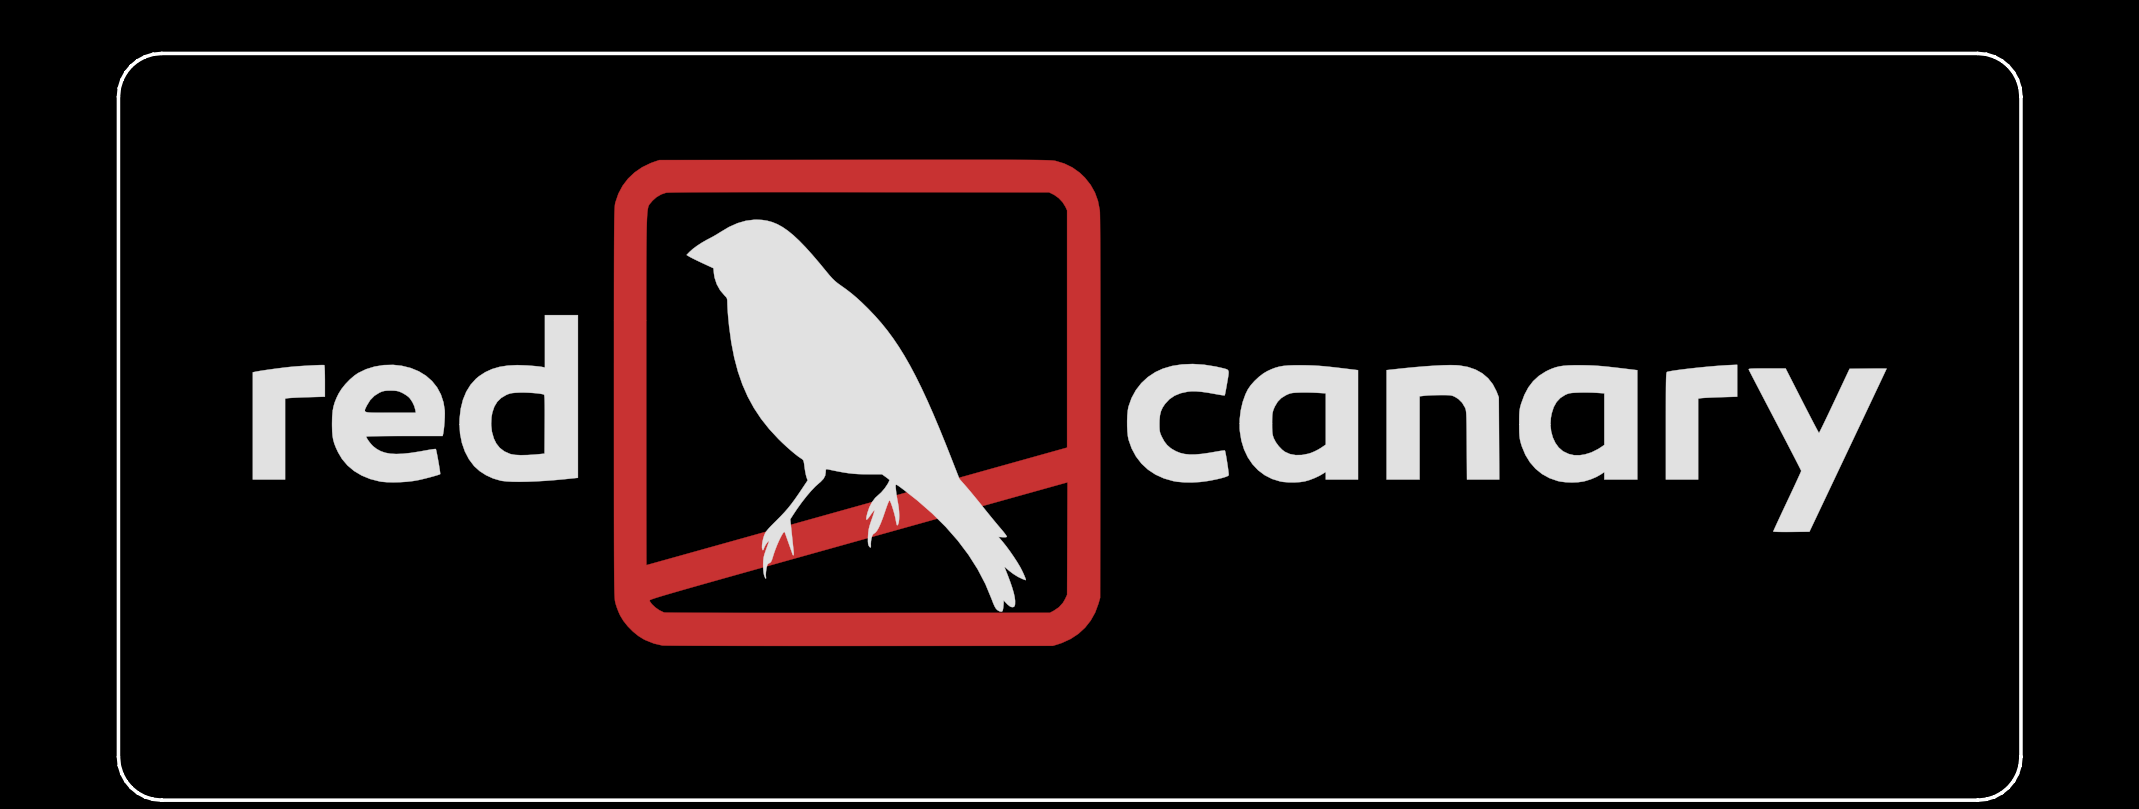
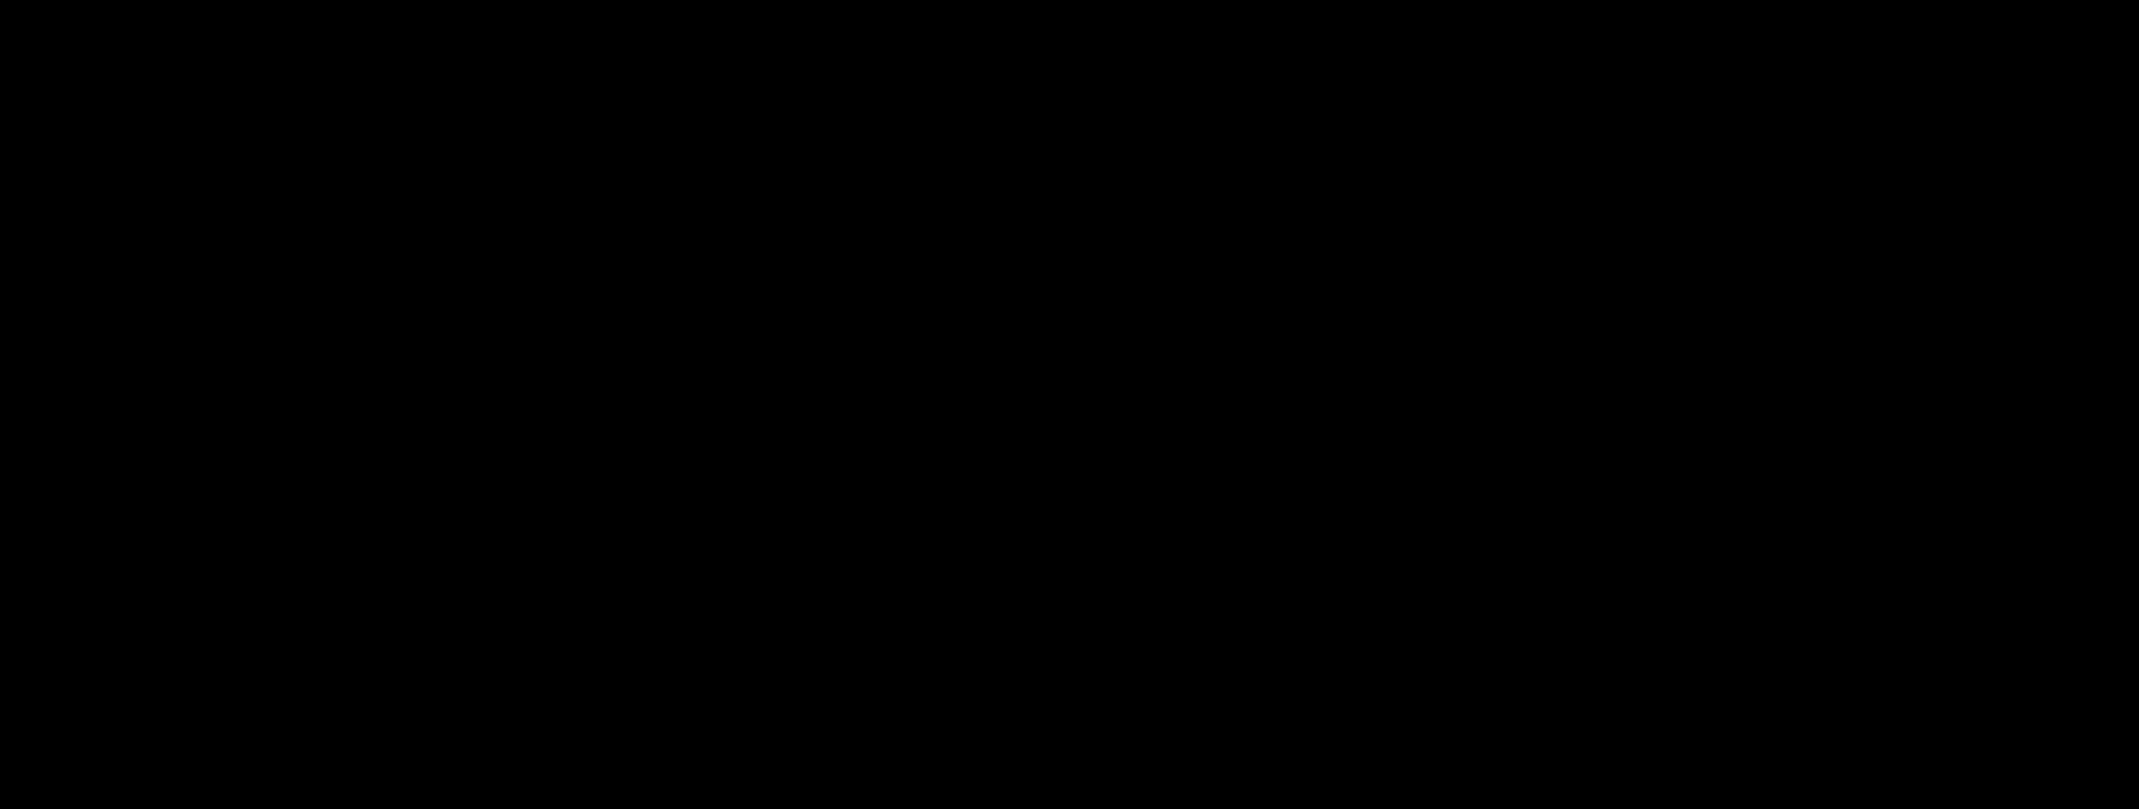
board edge: (161, 53) (1977, 53) (1994, 56) (2001, 60) (2013, 72) (2020, 88) (2020, 96) (2020, 756) (2017, 773) (2013, 781) (2001, 792) (1986, 799) (1977, 800) (161, 800) (144, 796) (137, 792) (125, 781) (119, 765) (118, 756) (118, 96) (121, 79) (131, 66) (144, 56) (161, 53) -> none
drawing: [252, 159, 1887, 647] -> none

